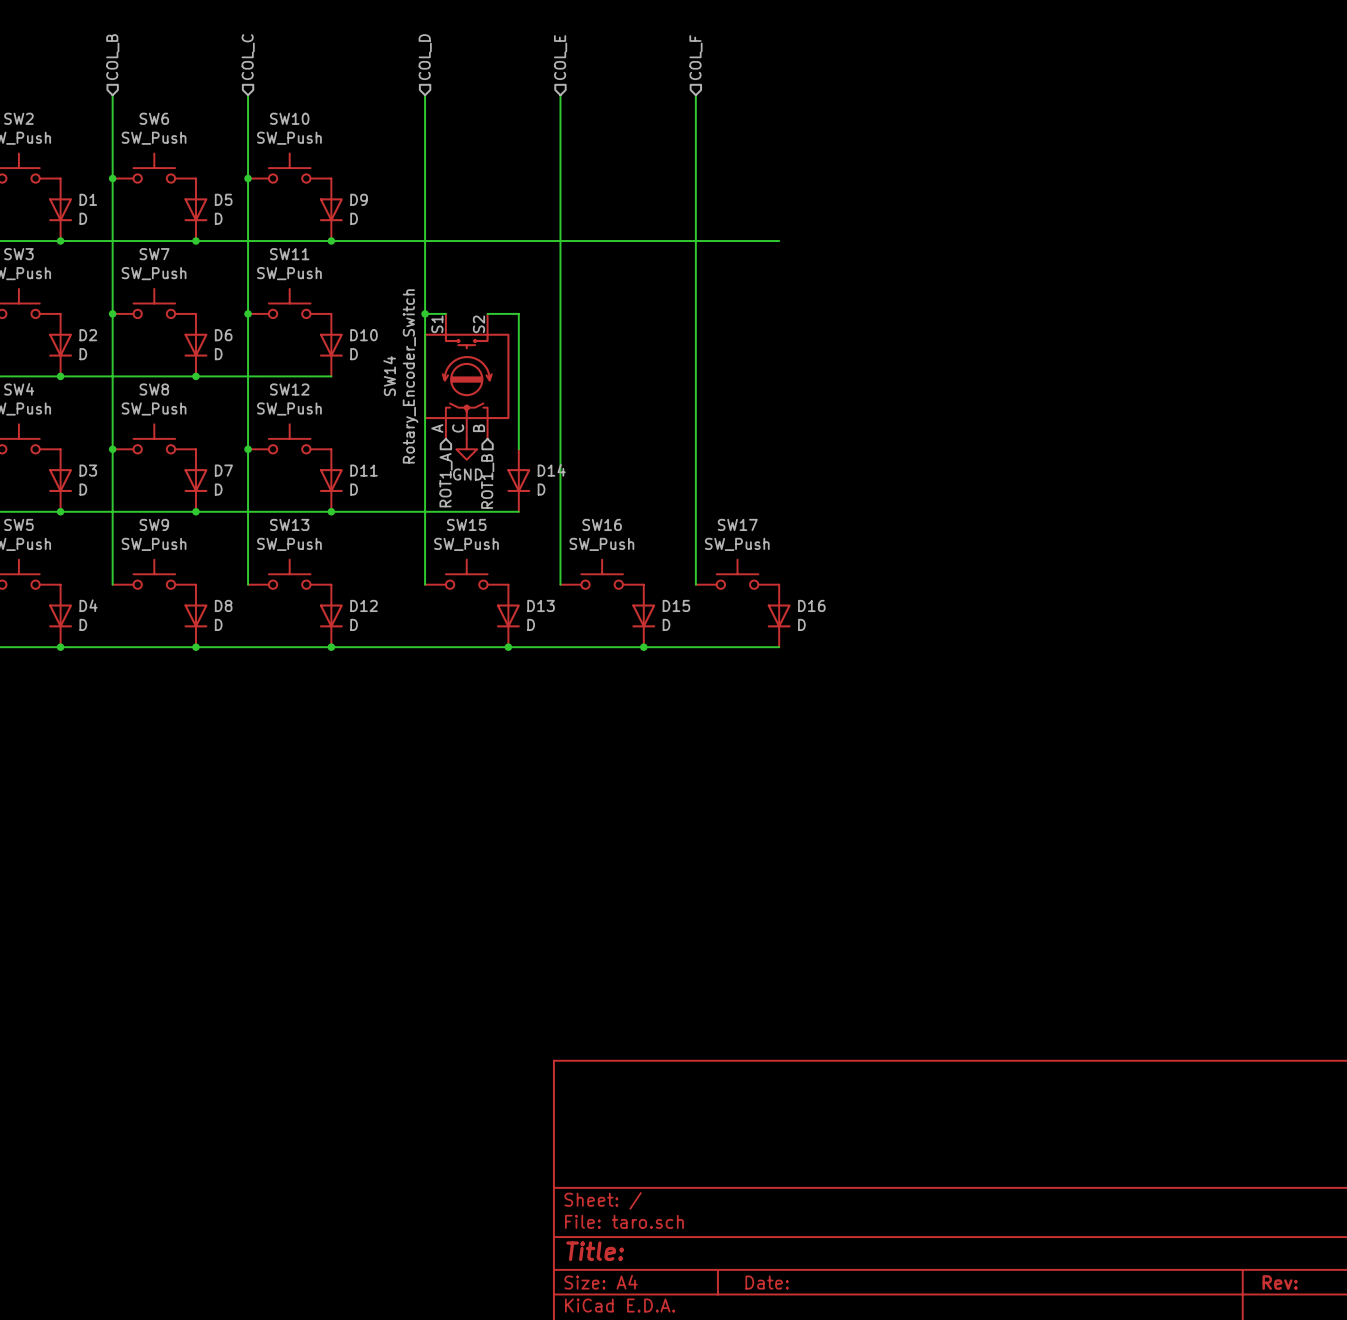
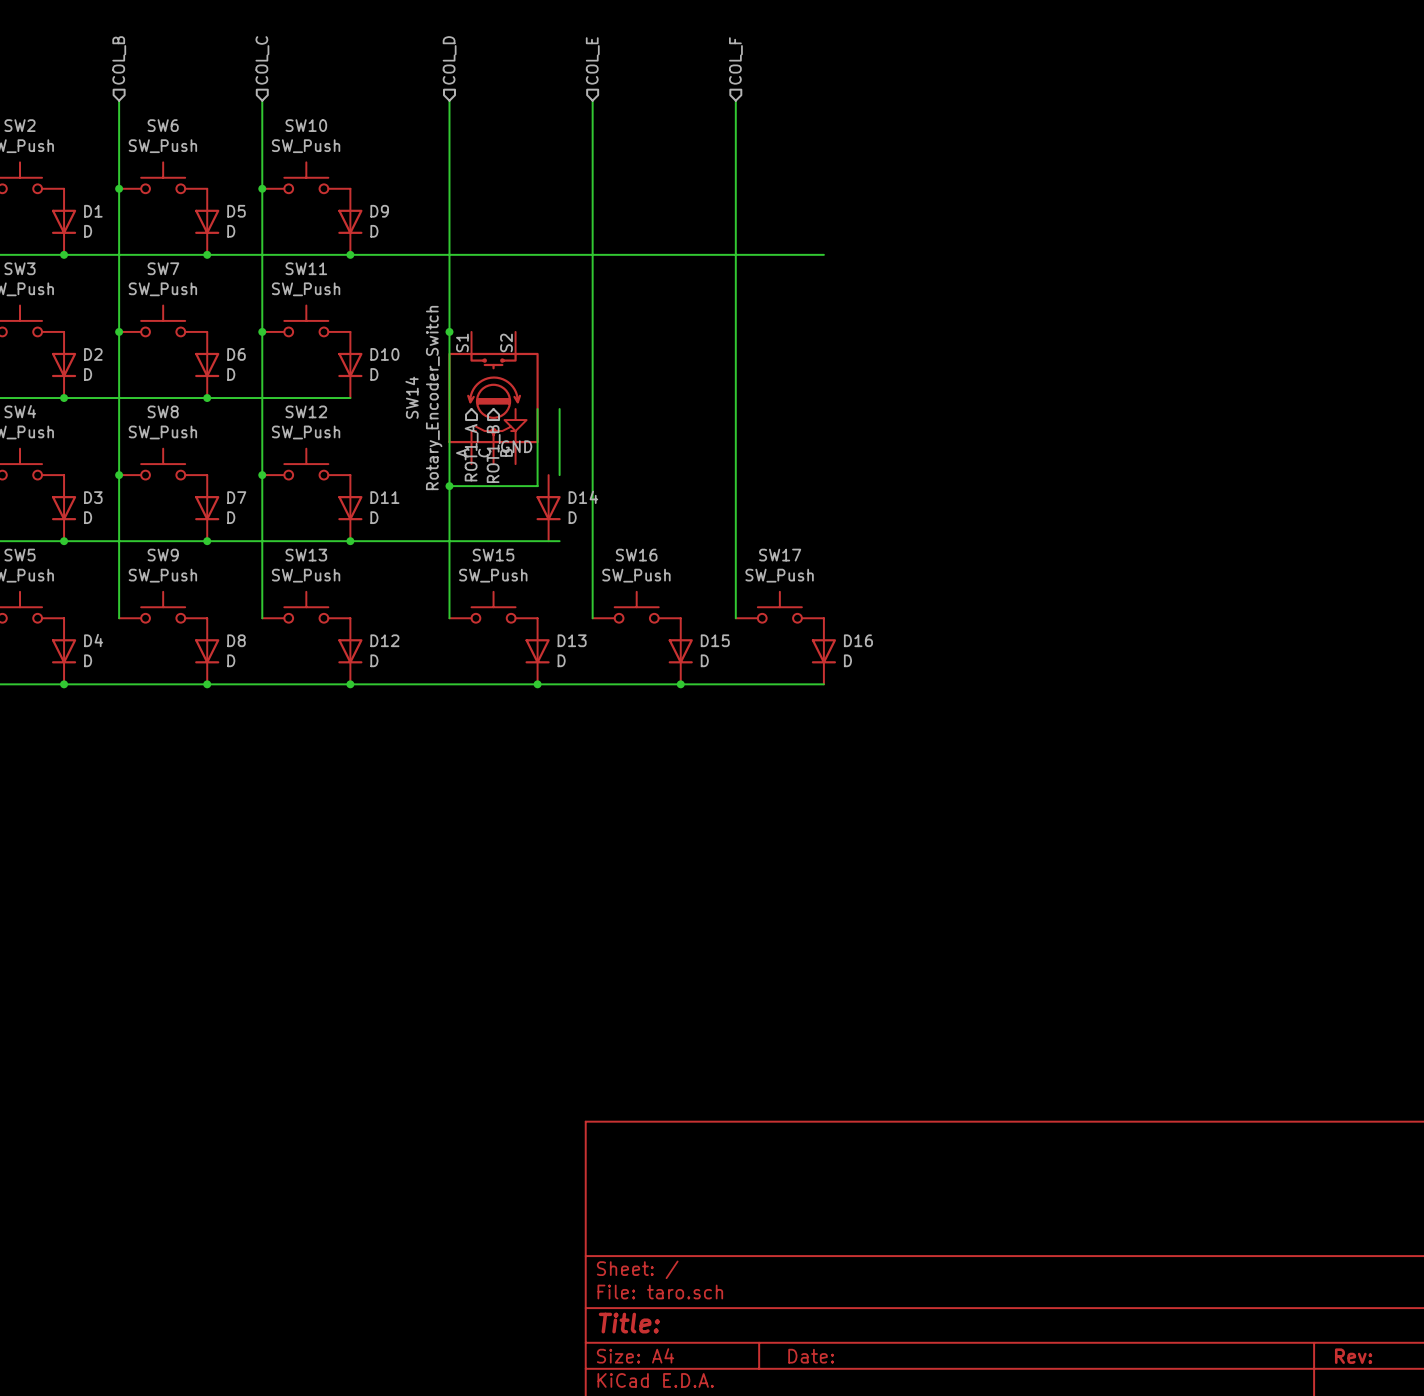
wire: (425, 313) (445, 313) -> none
wire: (487, 313) (518, 313) (518, 449) -> none
wire: none -> (537, 409) (537, 486) (449, 486)
wire: none -> (559, 409) (559, 475)
power symbol position: GND (466, 449) -> GND (515, 420)
junction: none -> (449, 486)
hierarchical label position: ROT1_A (446, 480) -> ROT1_A (471, 452)
hierarchical label position: ROT1_B (487, 481) -> ROT1_B (493, 454)
wire: none -> (548, 541) (559, 541)

